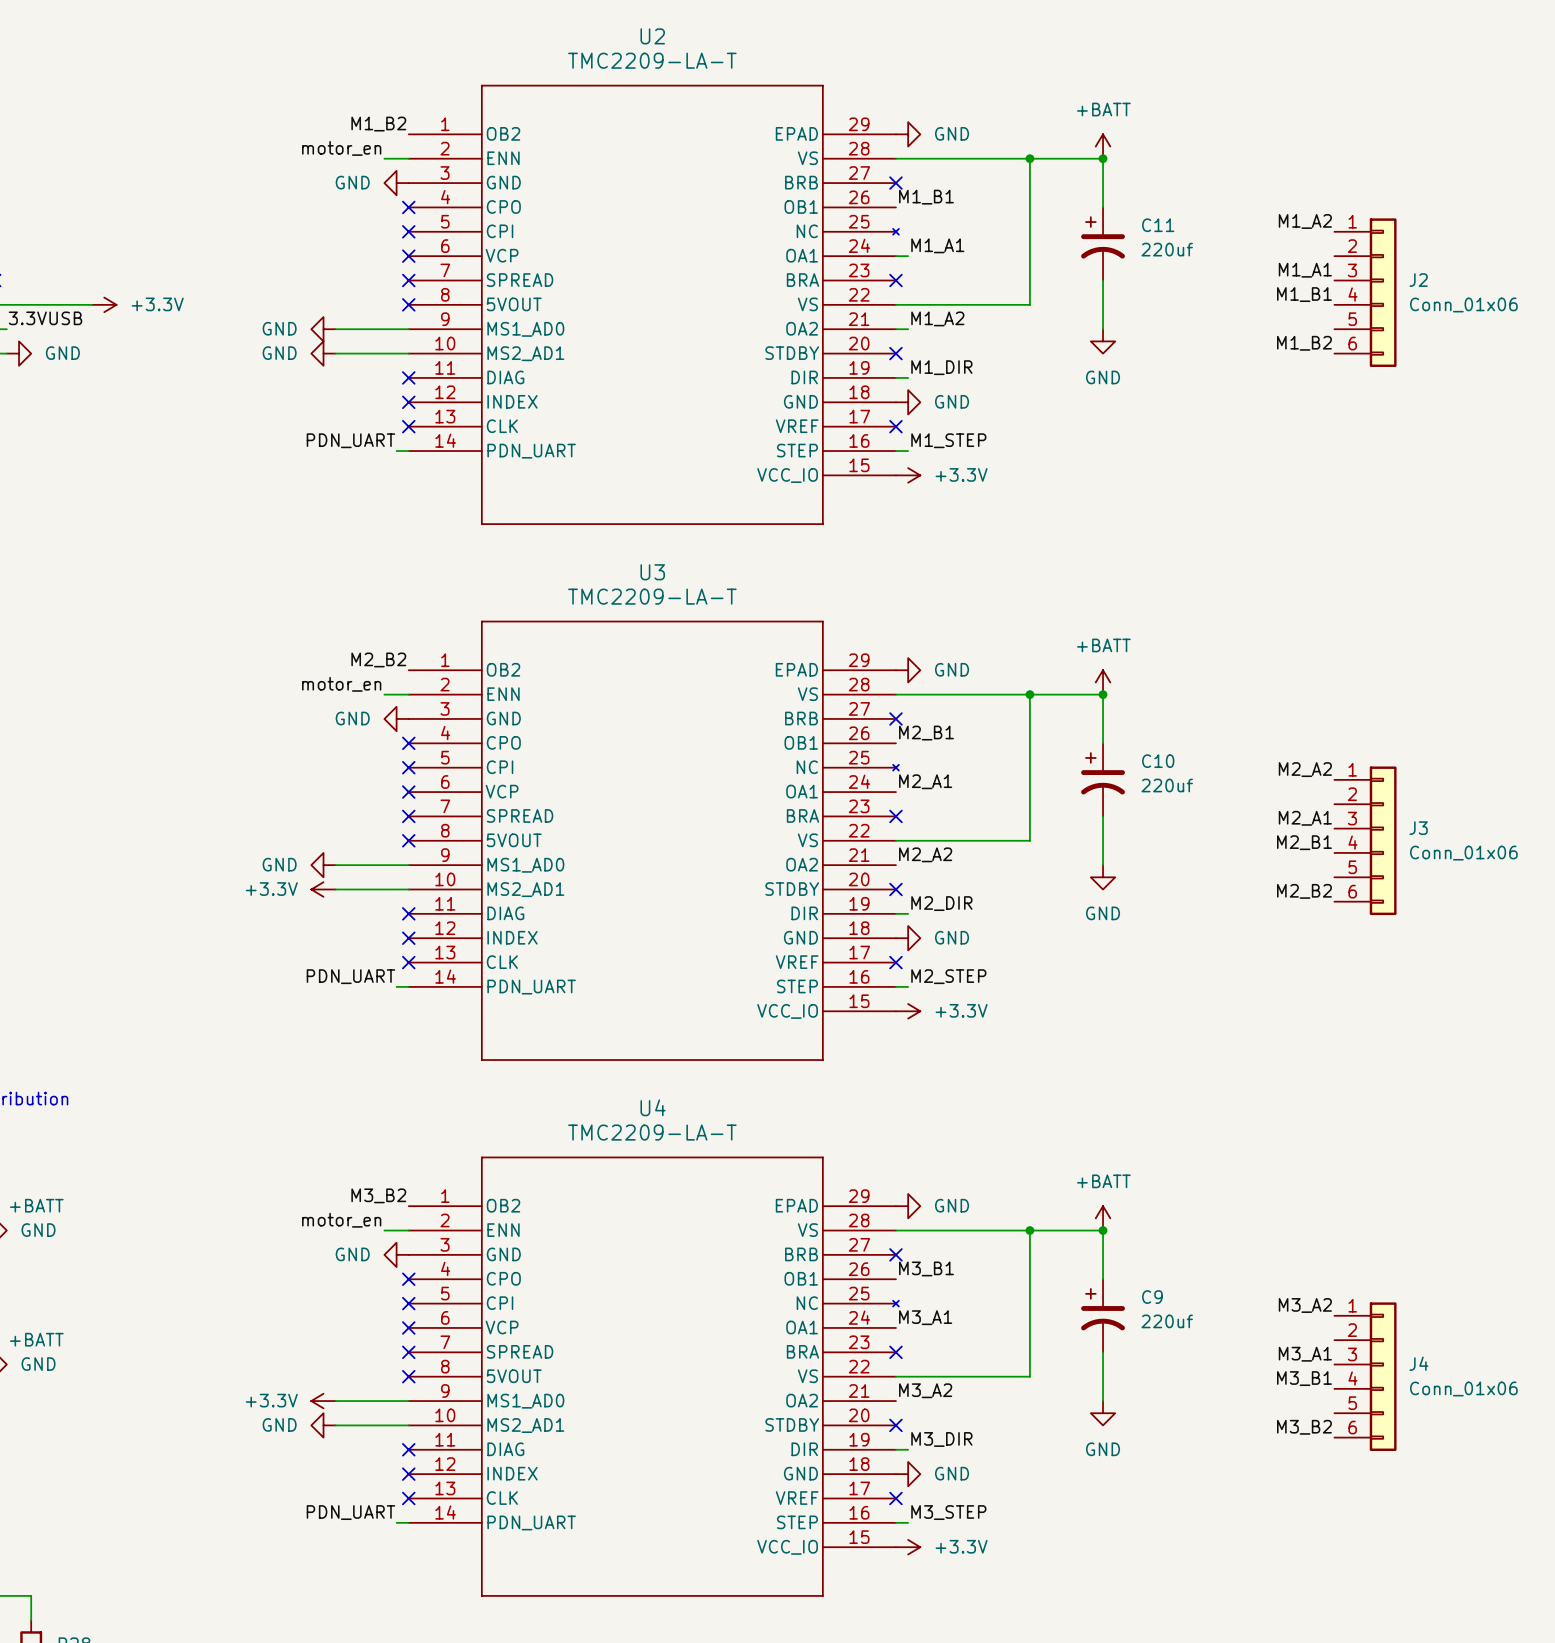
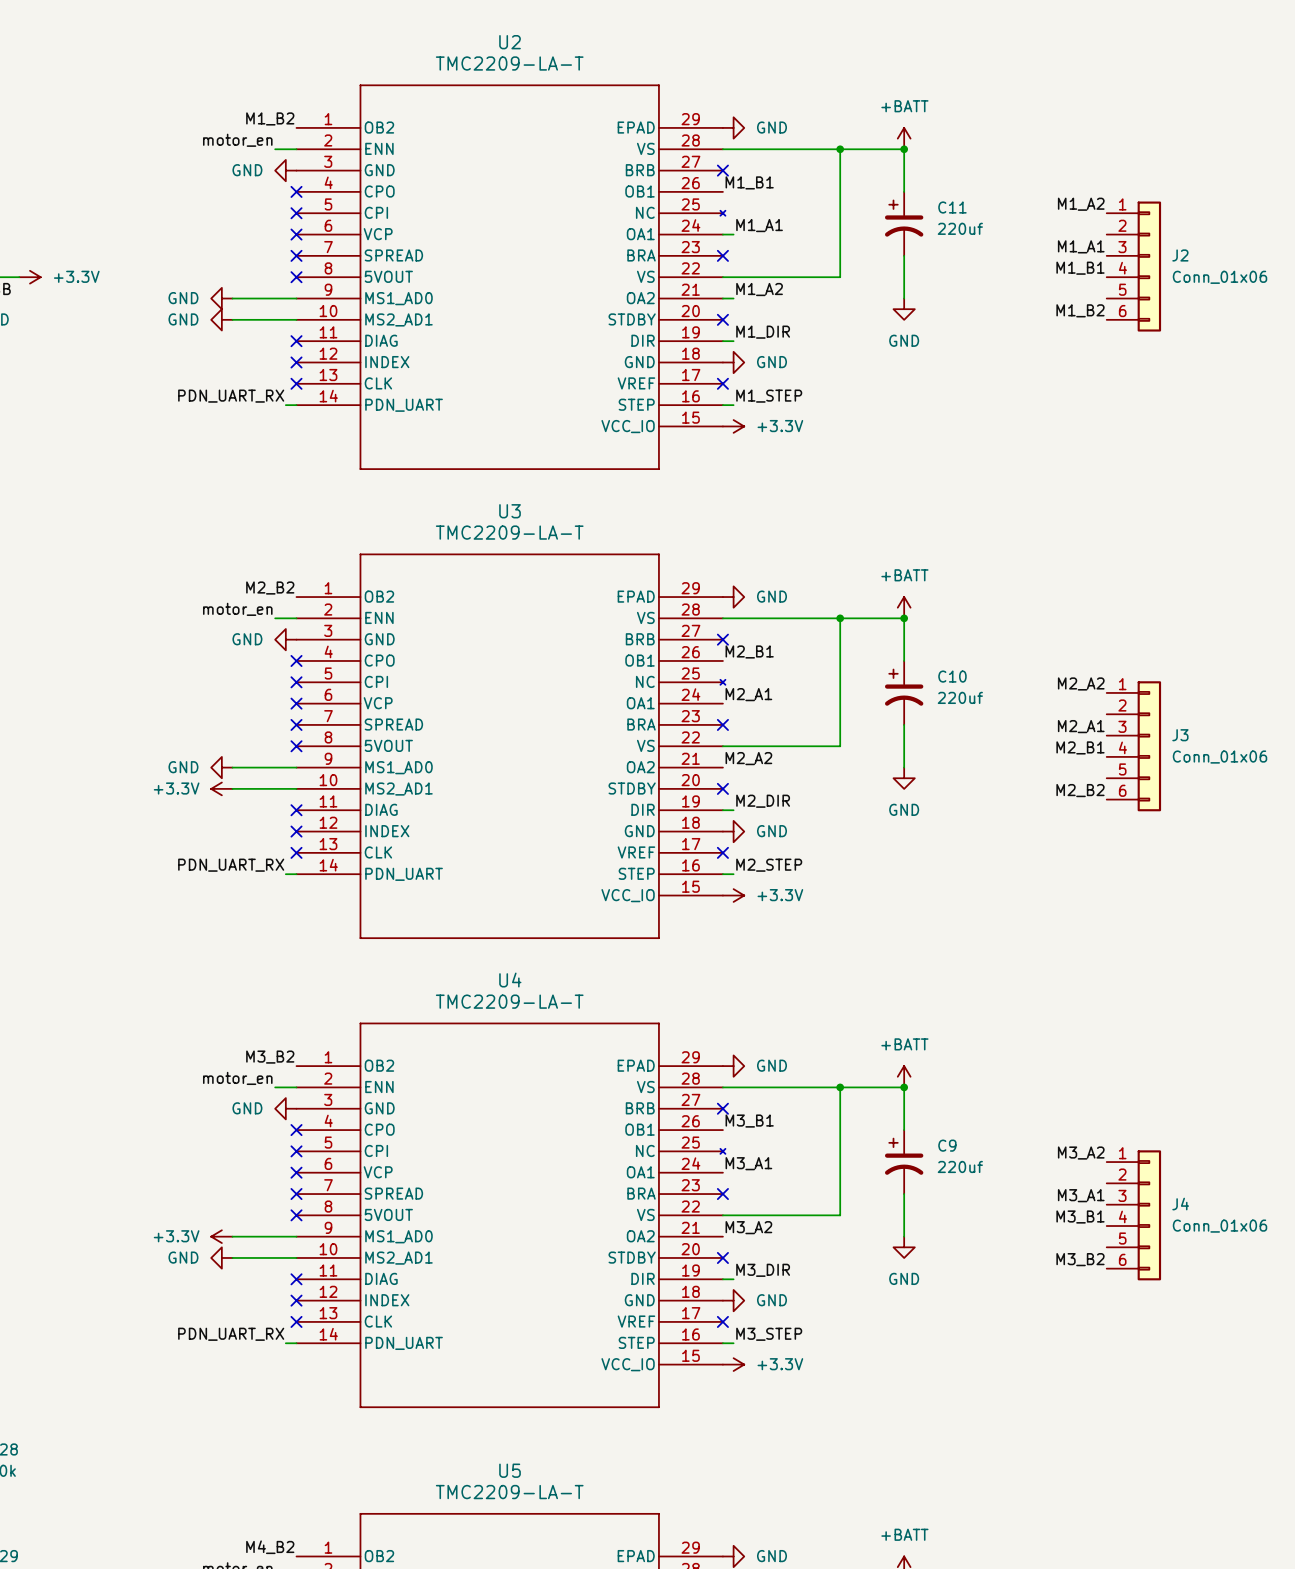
label: PDN_UART (350, 440) -> PDN_UART_RX (231, 396)
label: PDN_UART (350, 976) -> PDN_UART_RX (231, 865)
label: PDN_UART (350, 1512) -> PDN_UART_RX (231, 1334)

